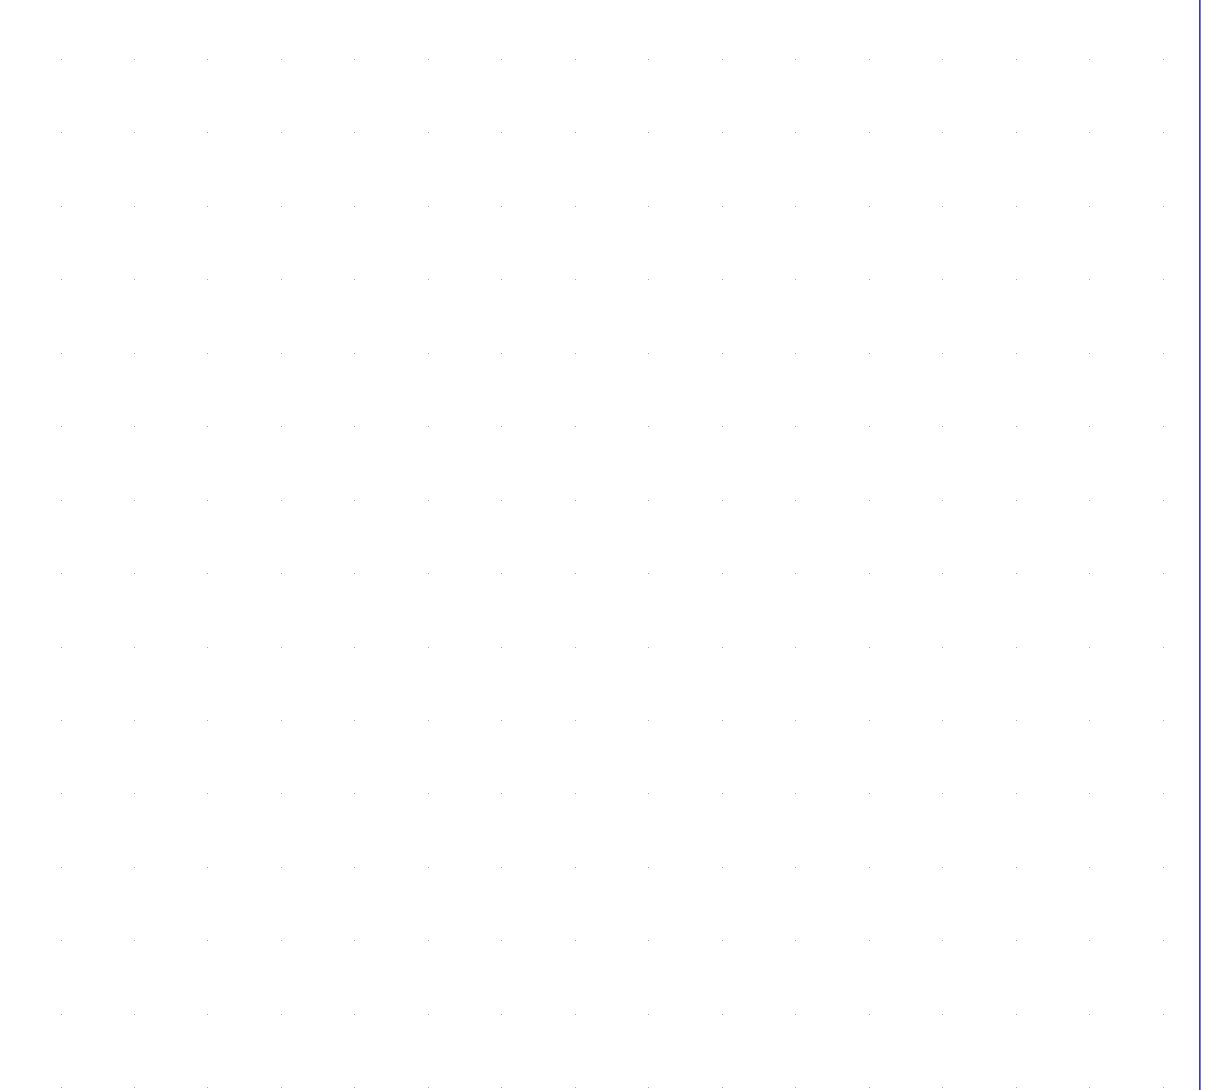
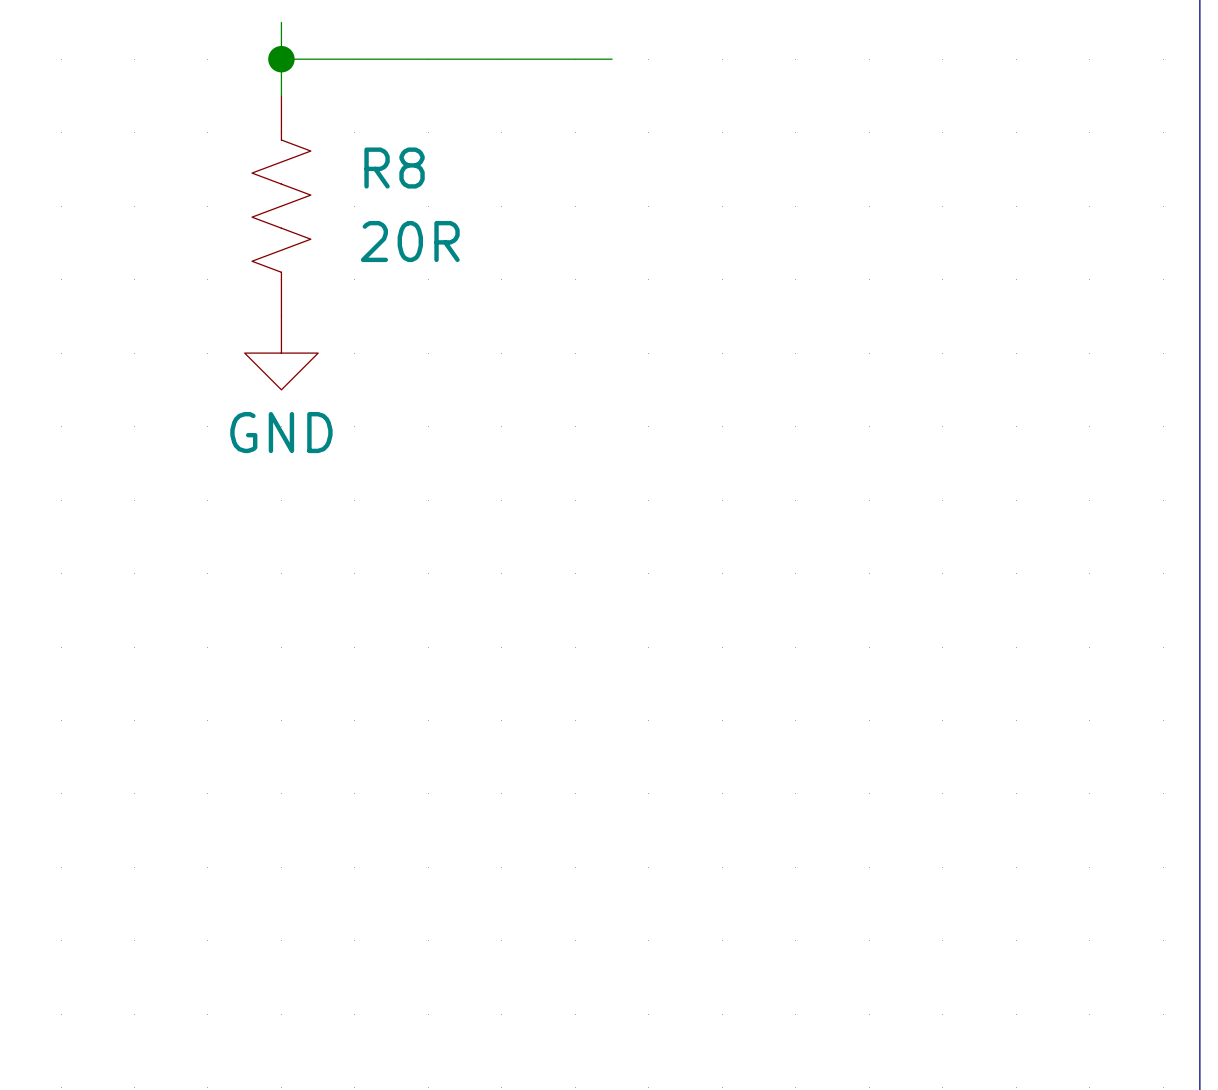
wire: none -> (281, 22) (281, 95)
wire: none -> (281, 59) (612, 59)
junction: none -> (281, 59)
R8: none -> 20R (281, 206)
power symbol: none -> GND (281, 353)

